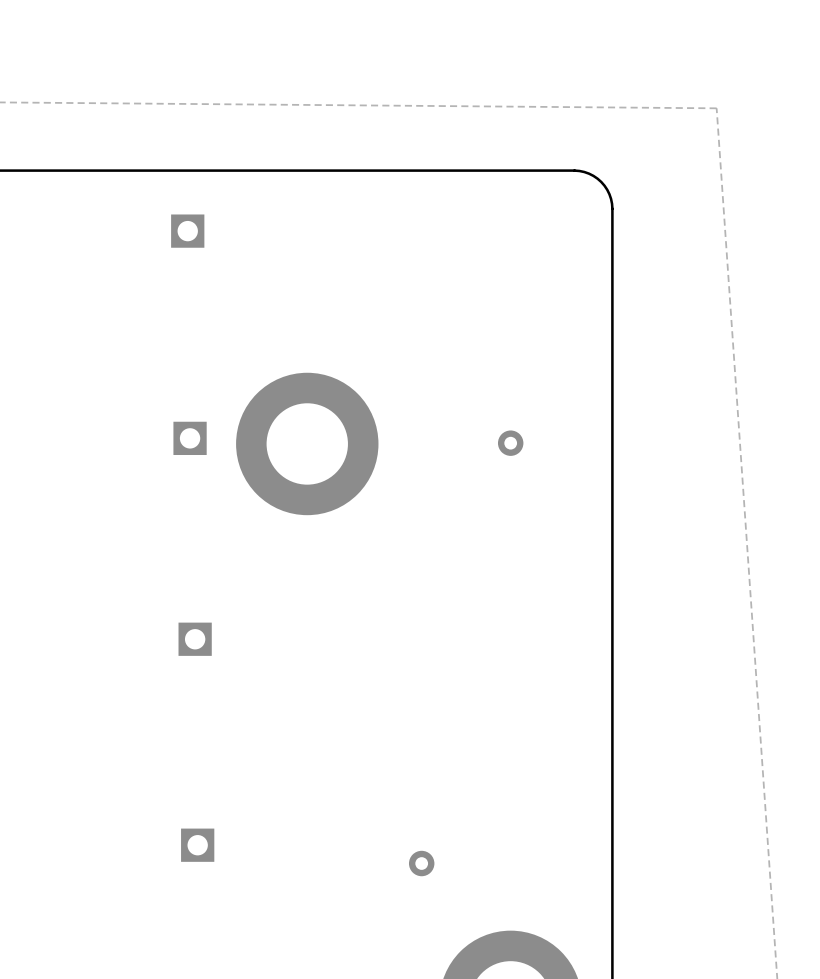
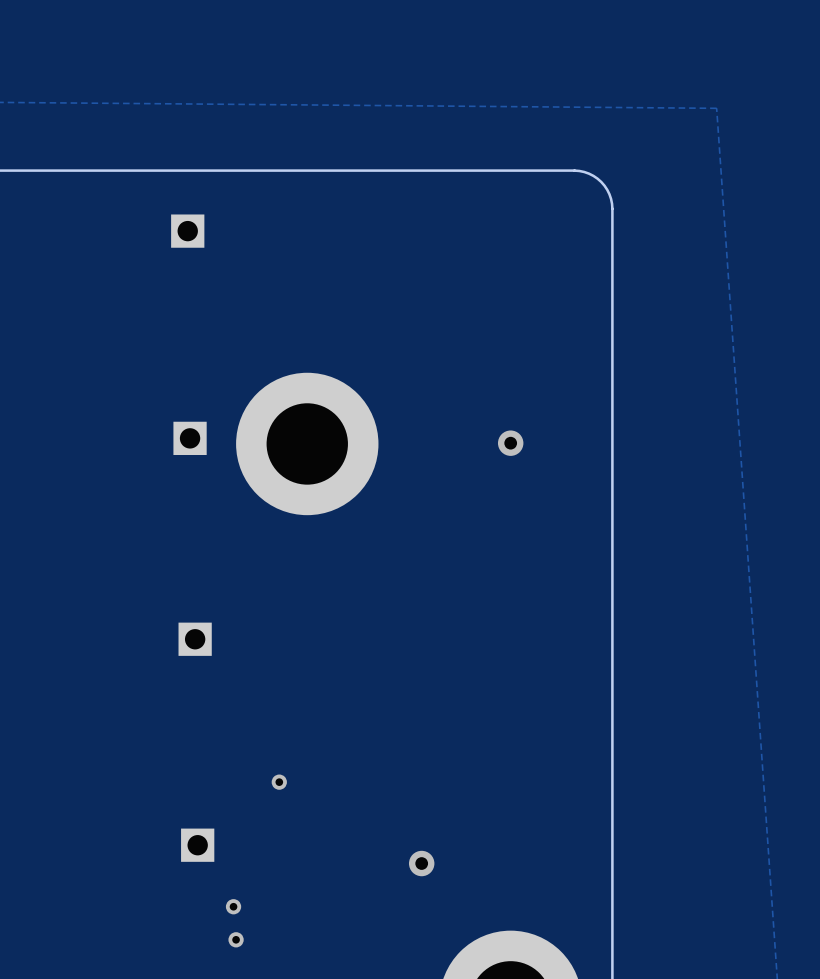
via: none -> (279, 782)
via: none -> (233, 906)
via: none -> (236, 939)

